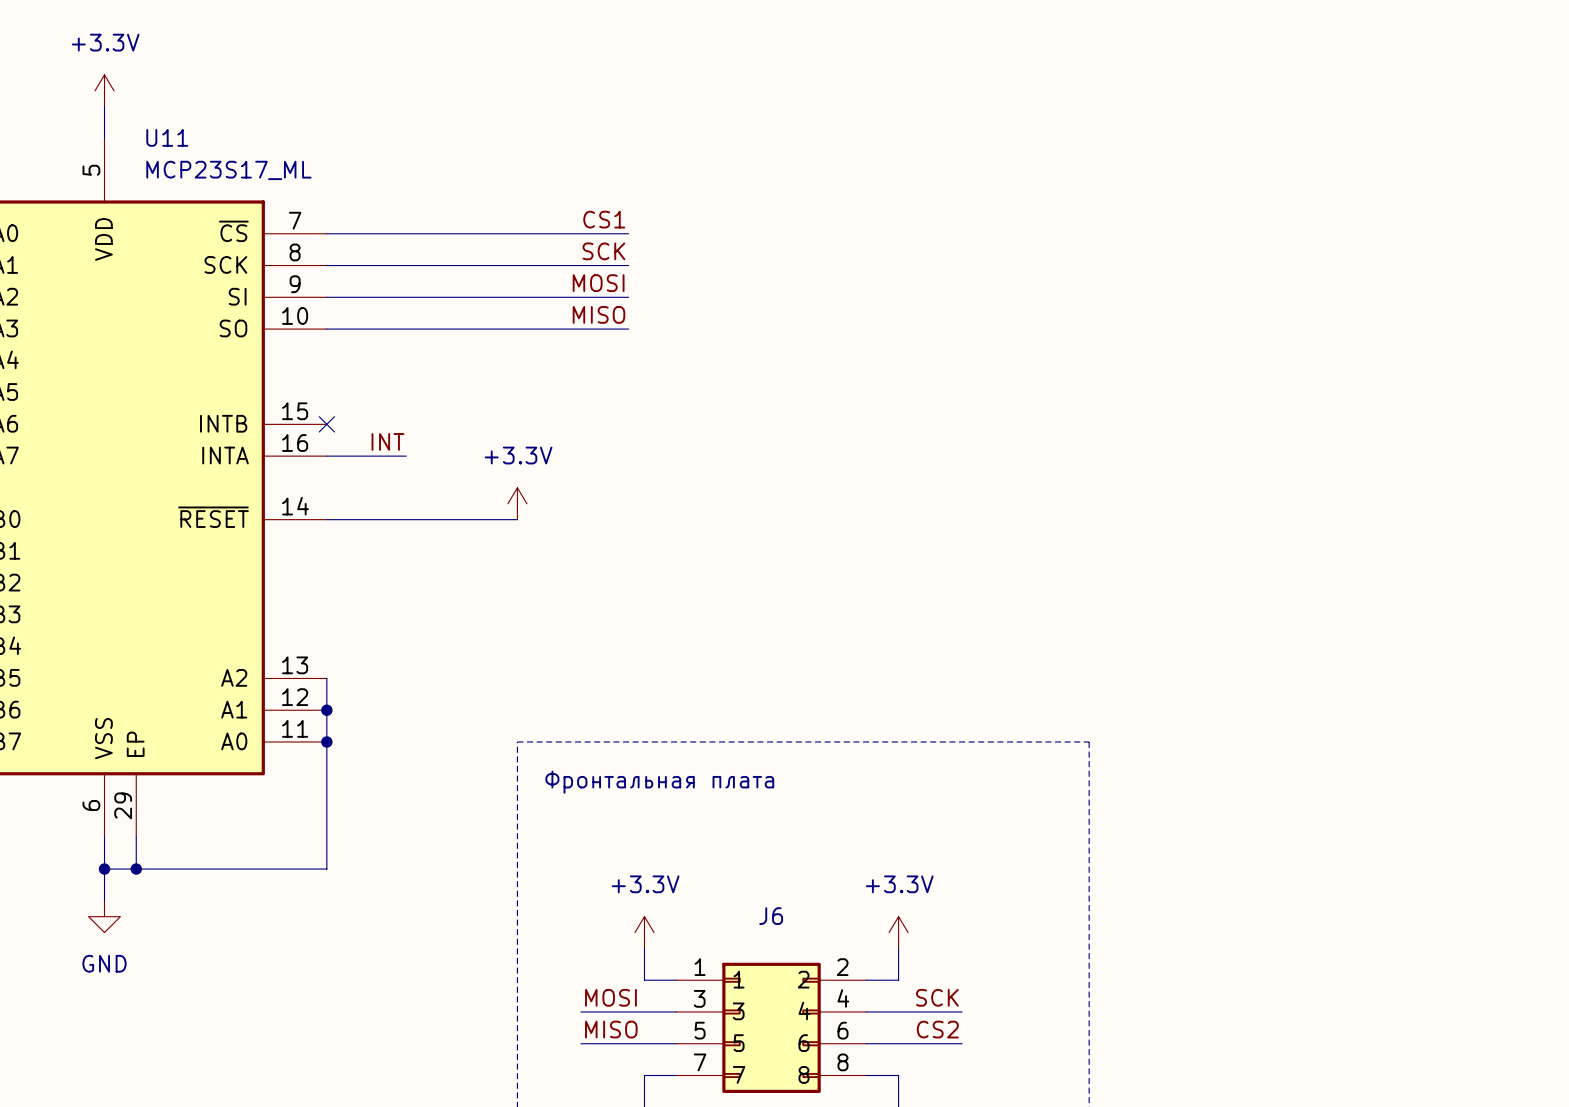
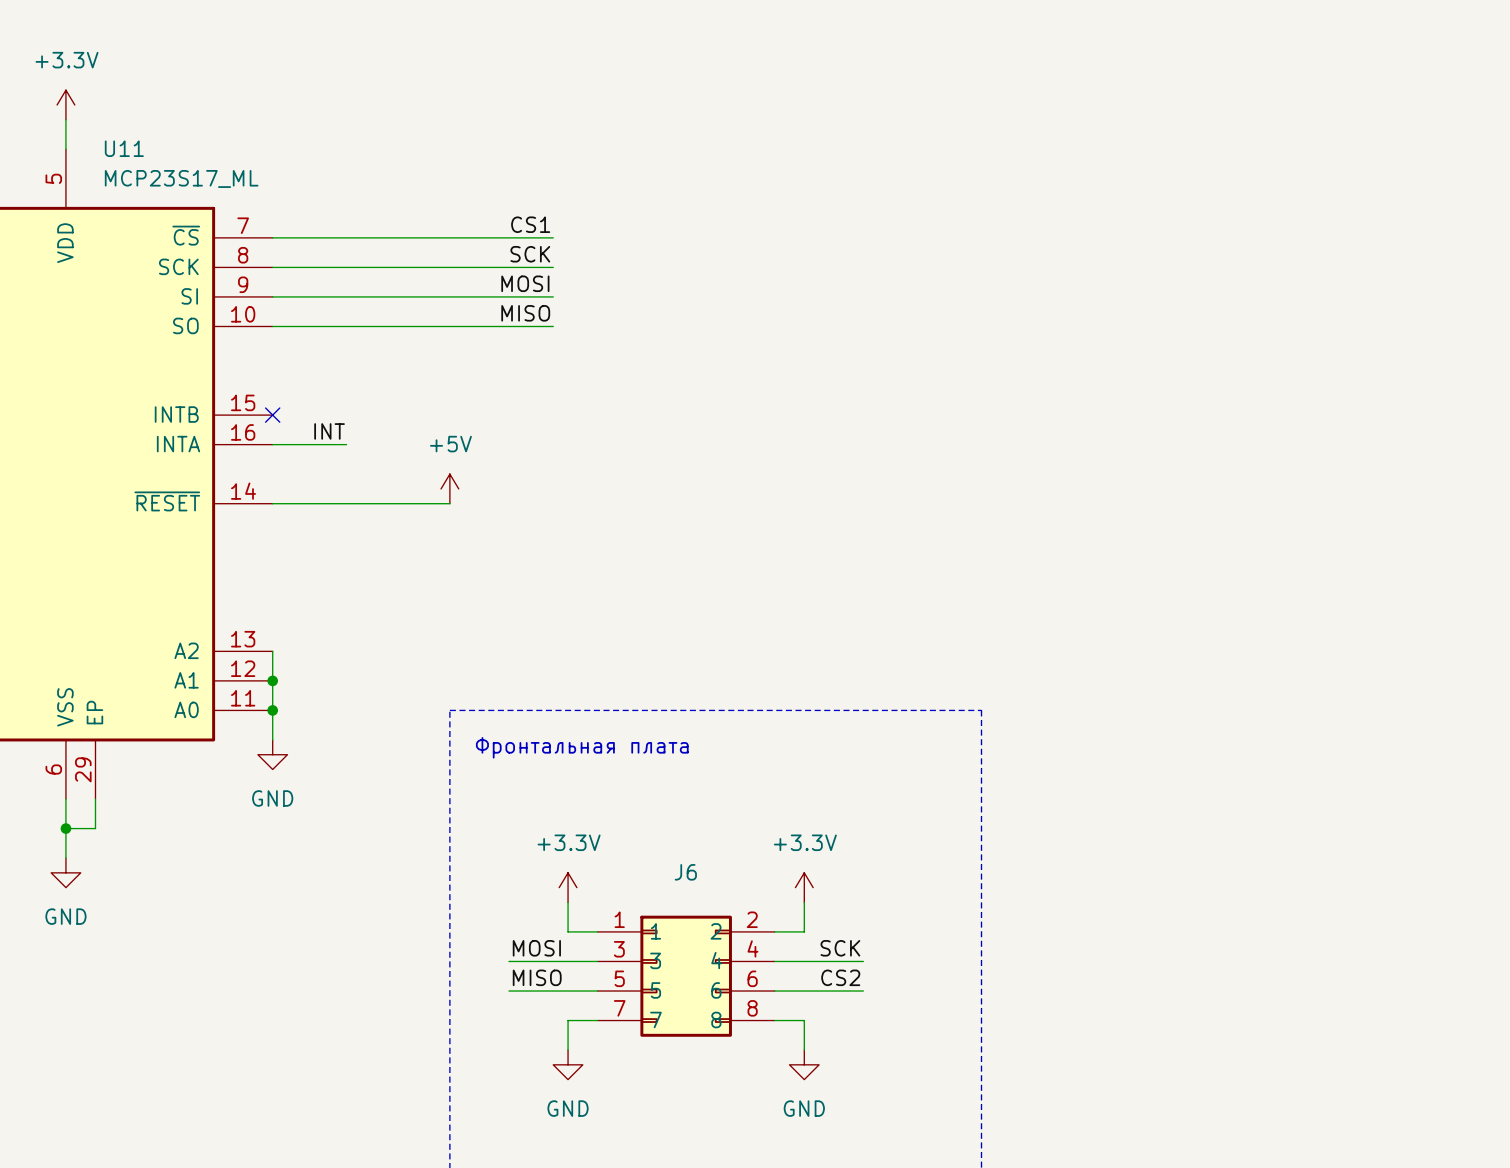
power symbol: +3.3V (517, 503) -> +5V (449, 488)
wire: (326, 773) (326, 869) (136, 869) -> none
power symbol: none -> GND (272, 754)
junction: (136, 869) -> none

